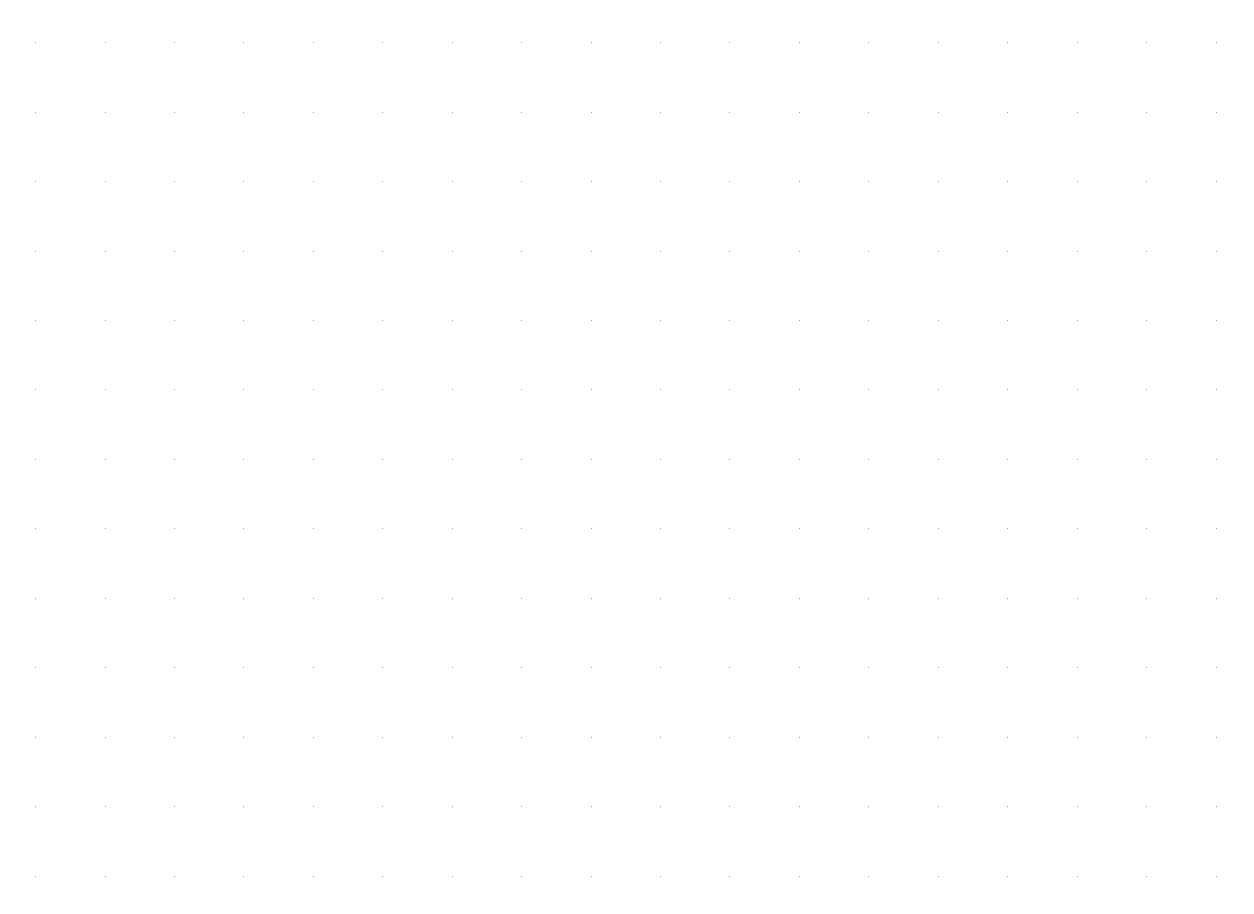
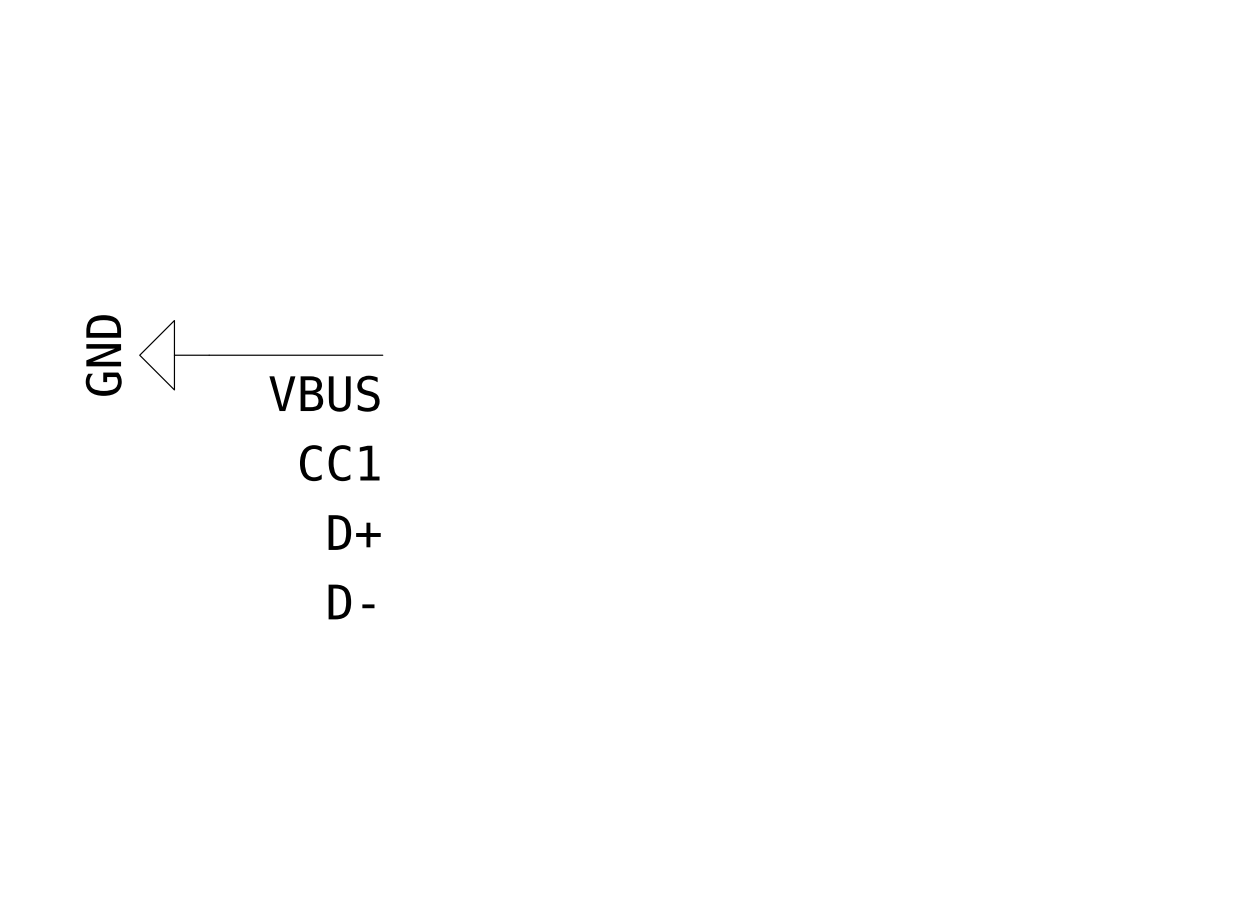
power symbol: none -> GND (174, 355)
wire: none -> (209, 355) (382, 355)
label: none -> VBUS (324, 393)
label: none -> CC1 (339, 463)
label: none -> D+ (354, 532)
label: none -> D- (351, 602)

